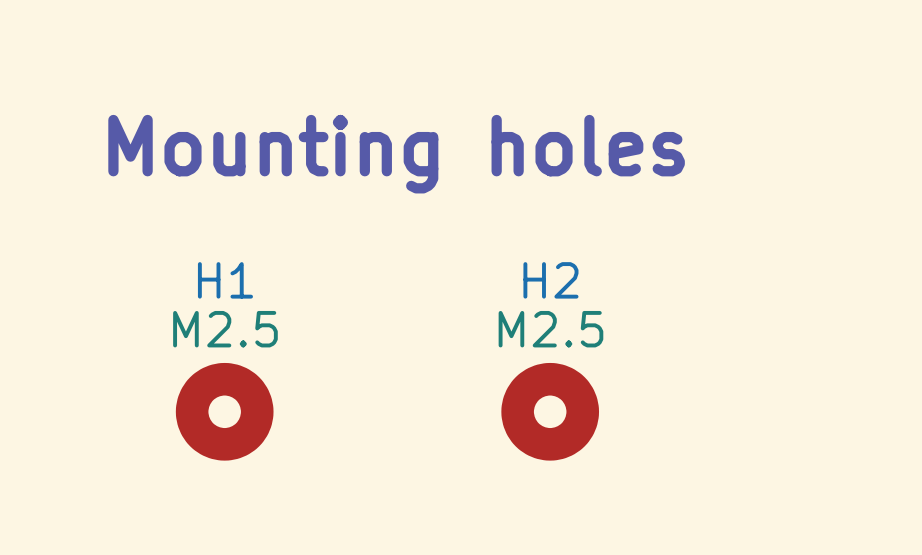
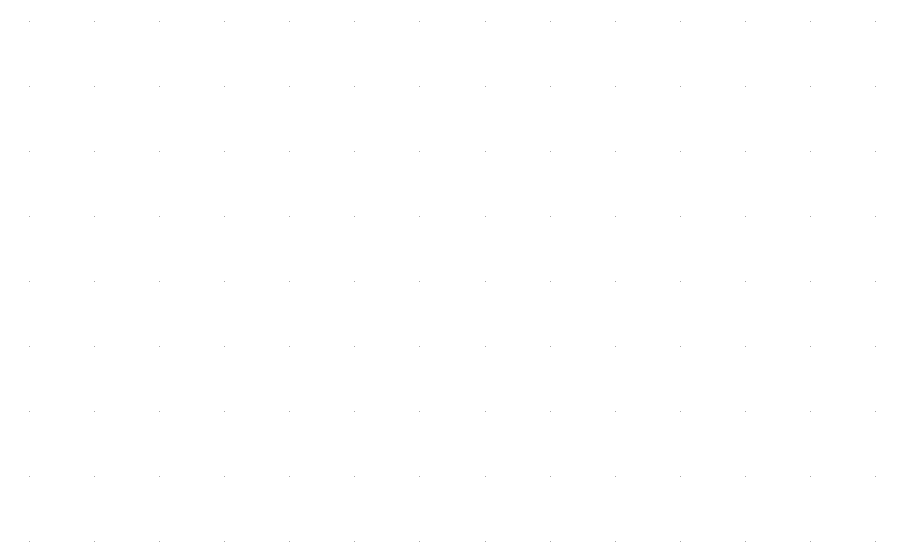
text: Mounting holes (396, 154) -> none
H1: M2.5 (224, 411) -> none
H2: M2.5 (550, 411) -> none

